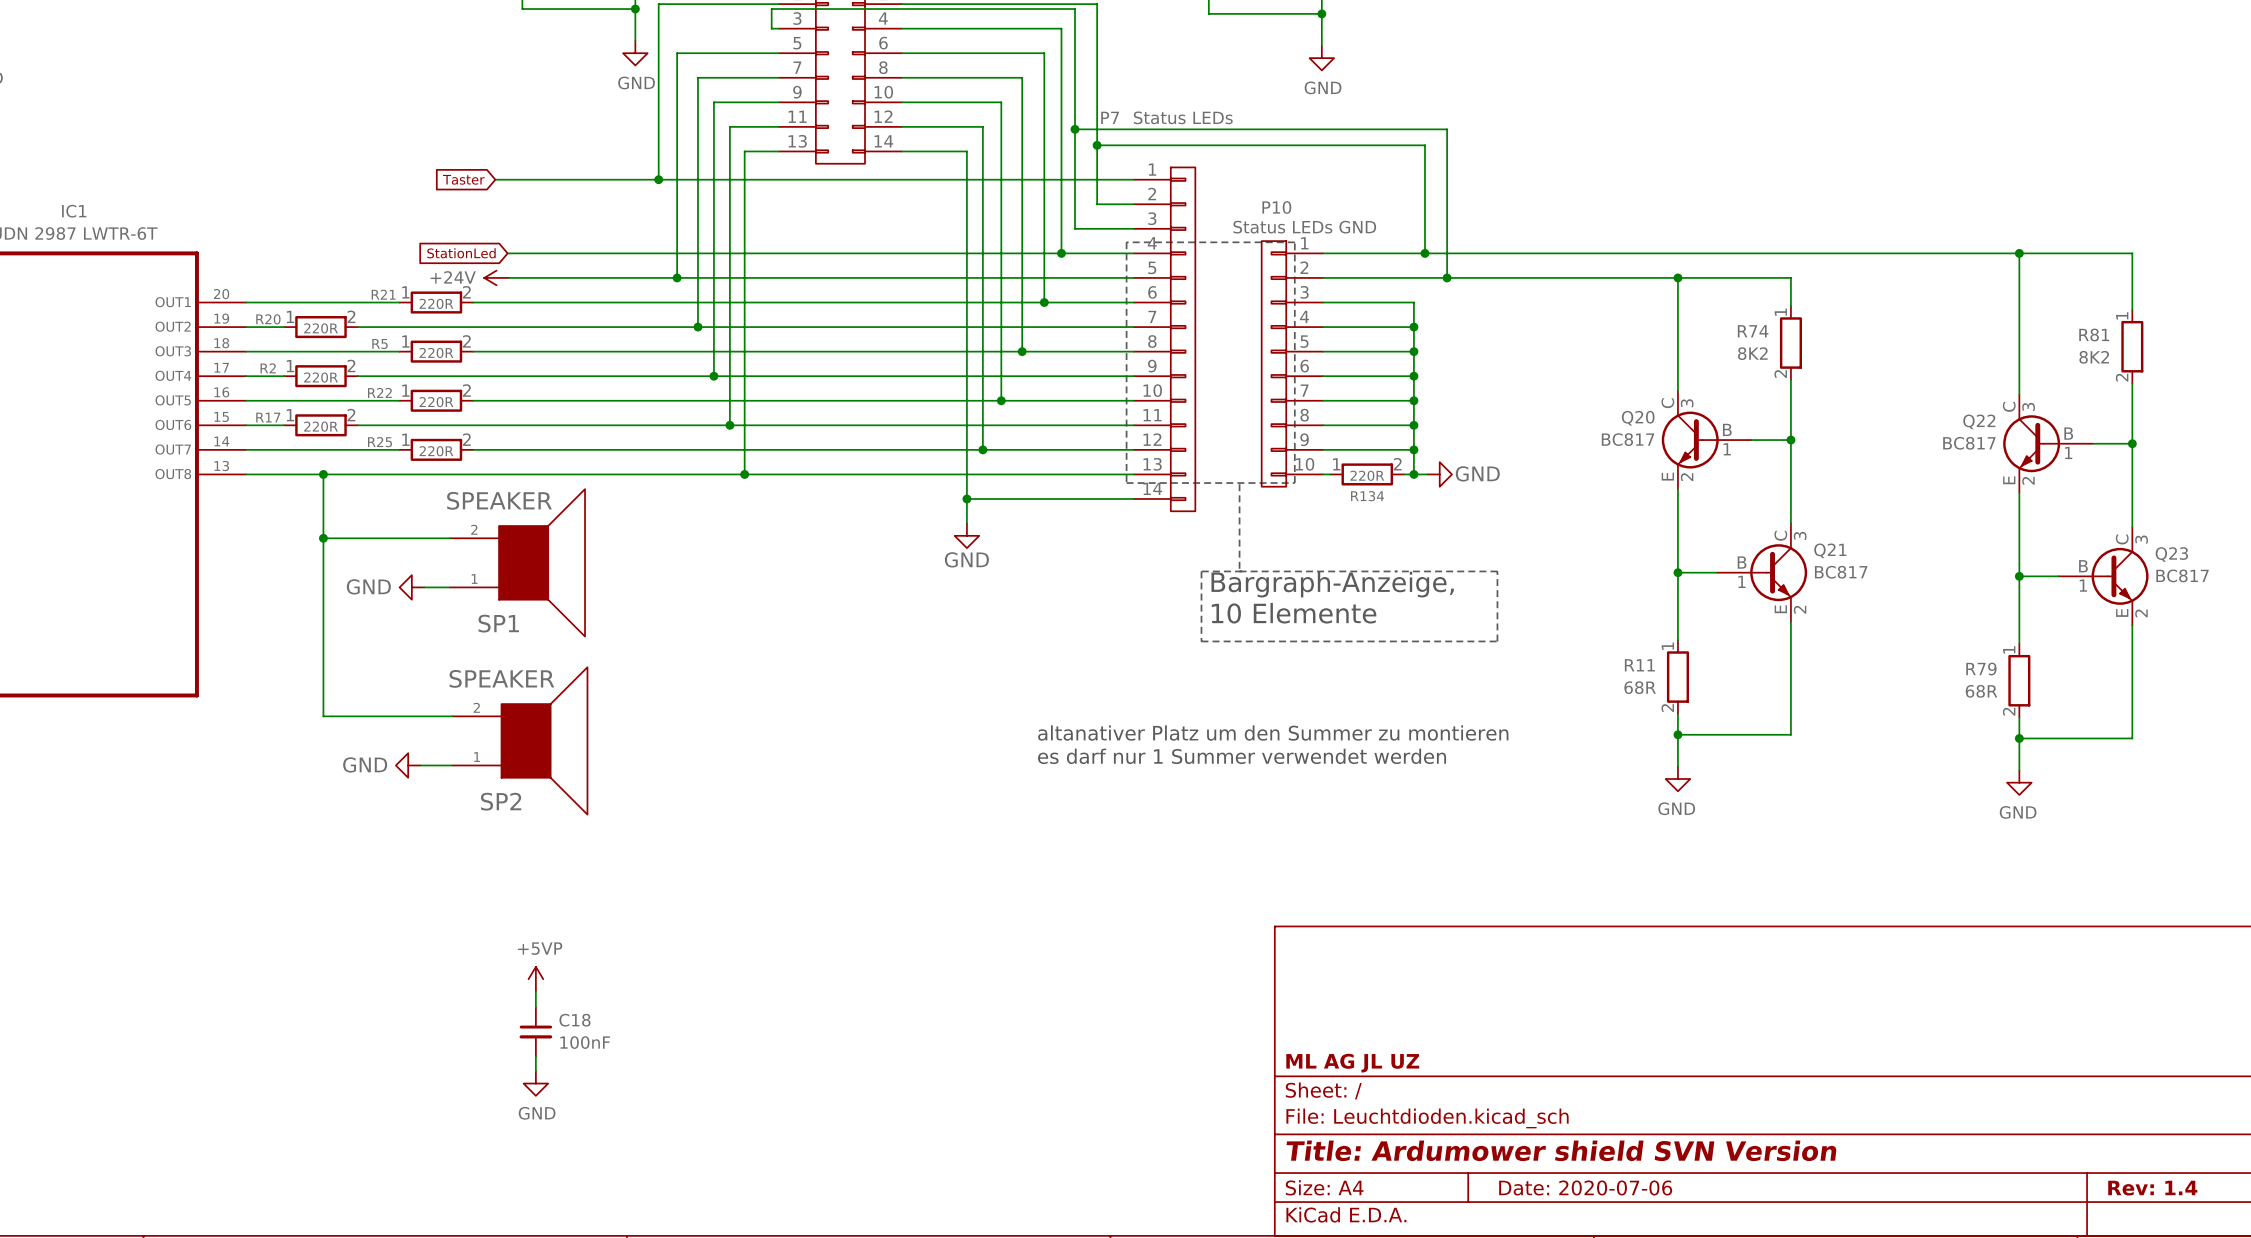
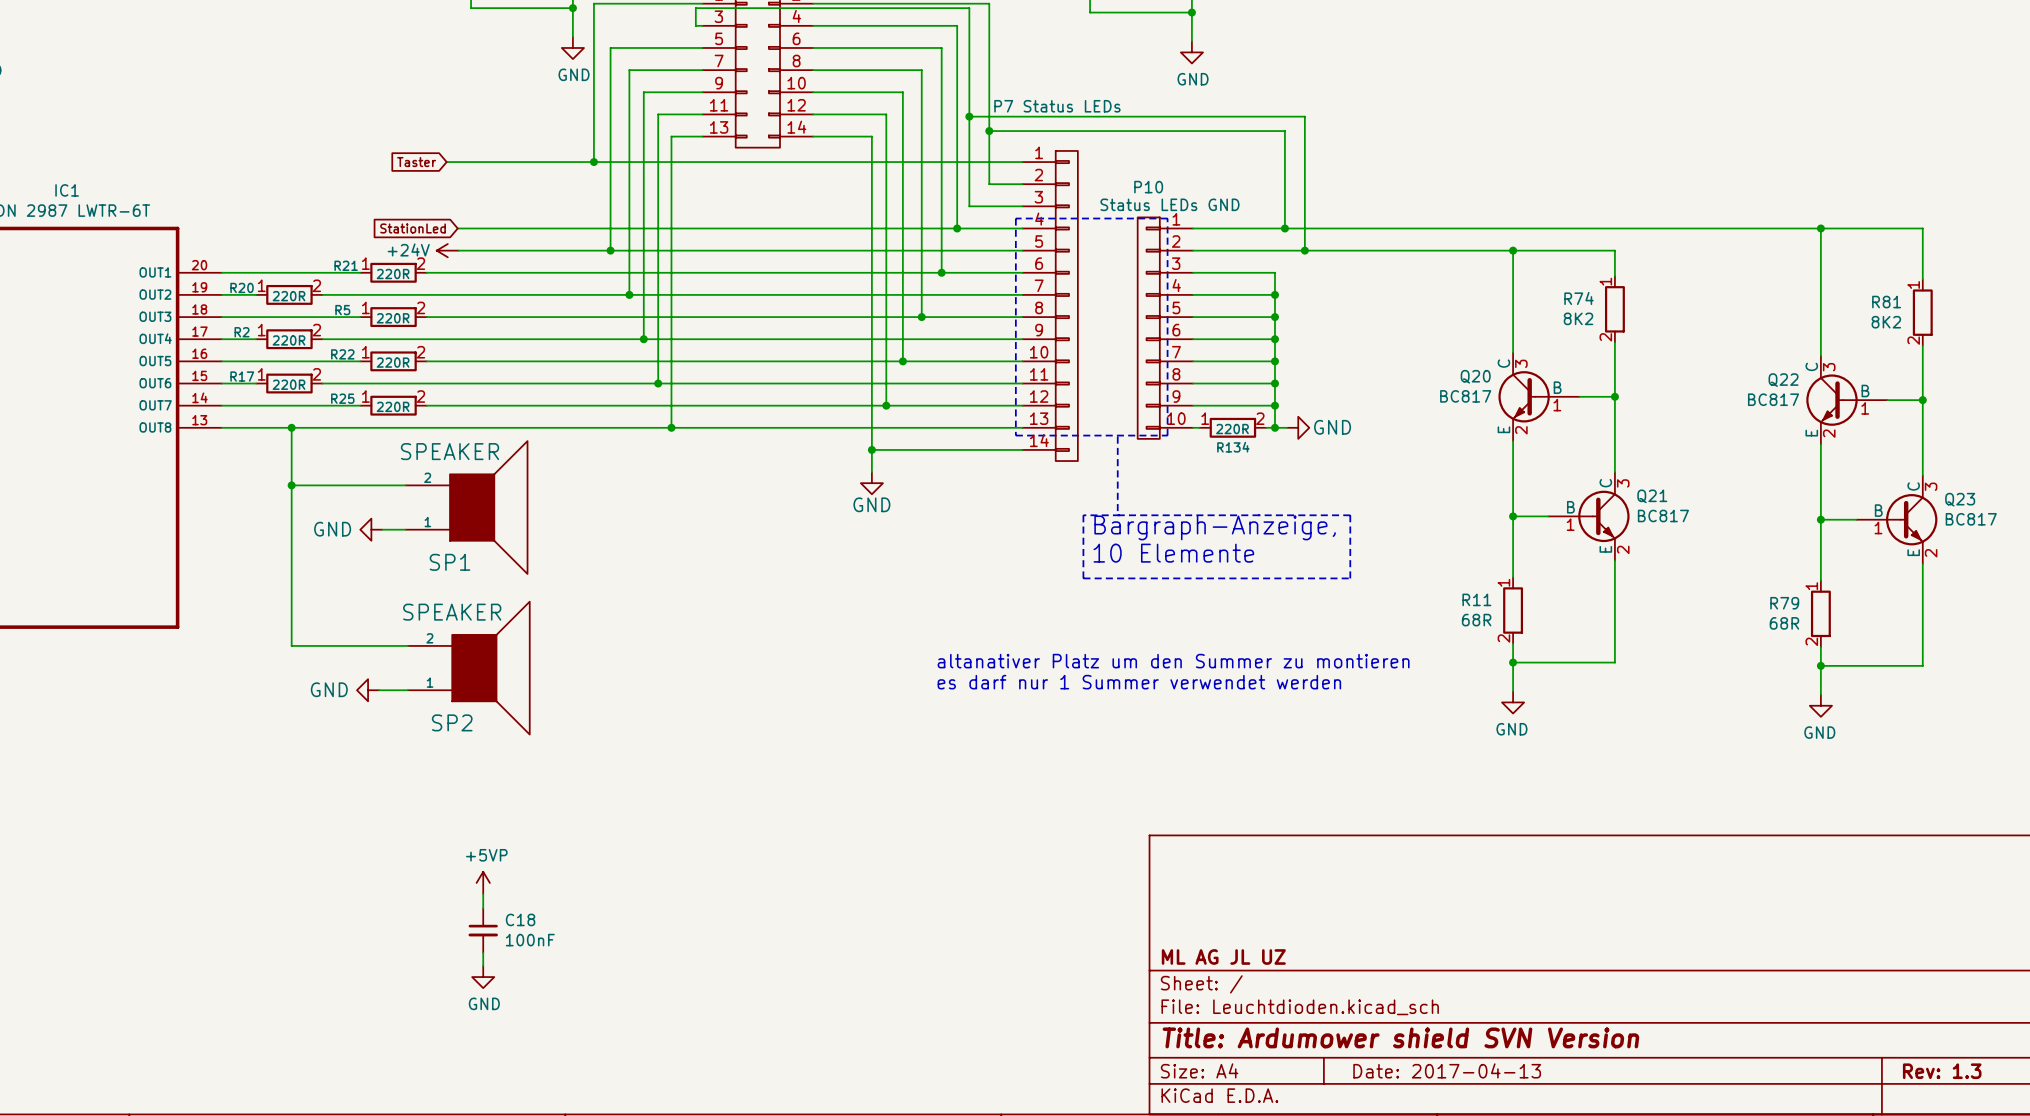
title block: Date: 2020-07-06 (1585, 1187) -> Date: 2017-04-13 (1447, 1070)
title block: Rev: 1.4 (2152, 1188) -> Rev: 1.3 (1942, 1071)

